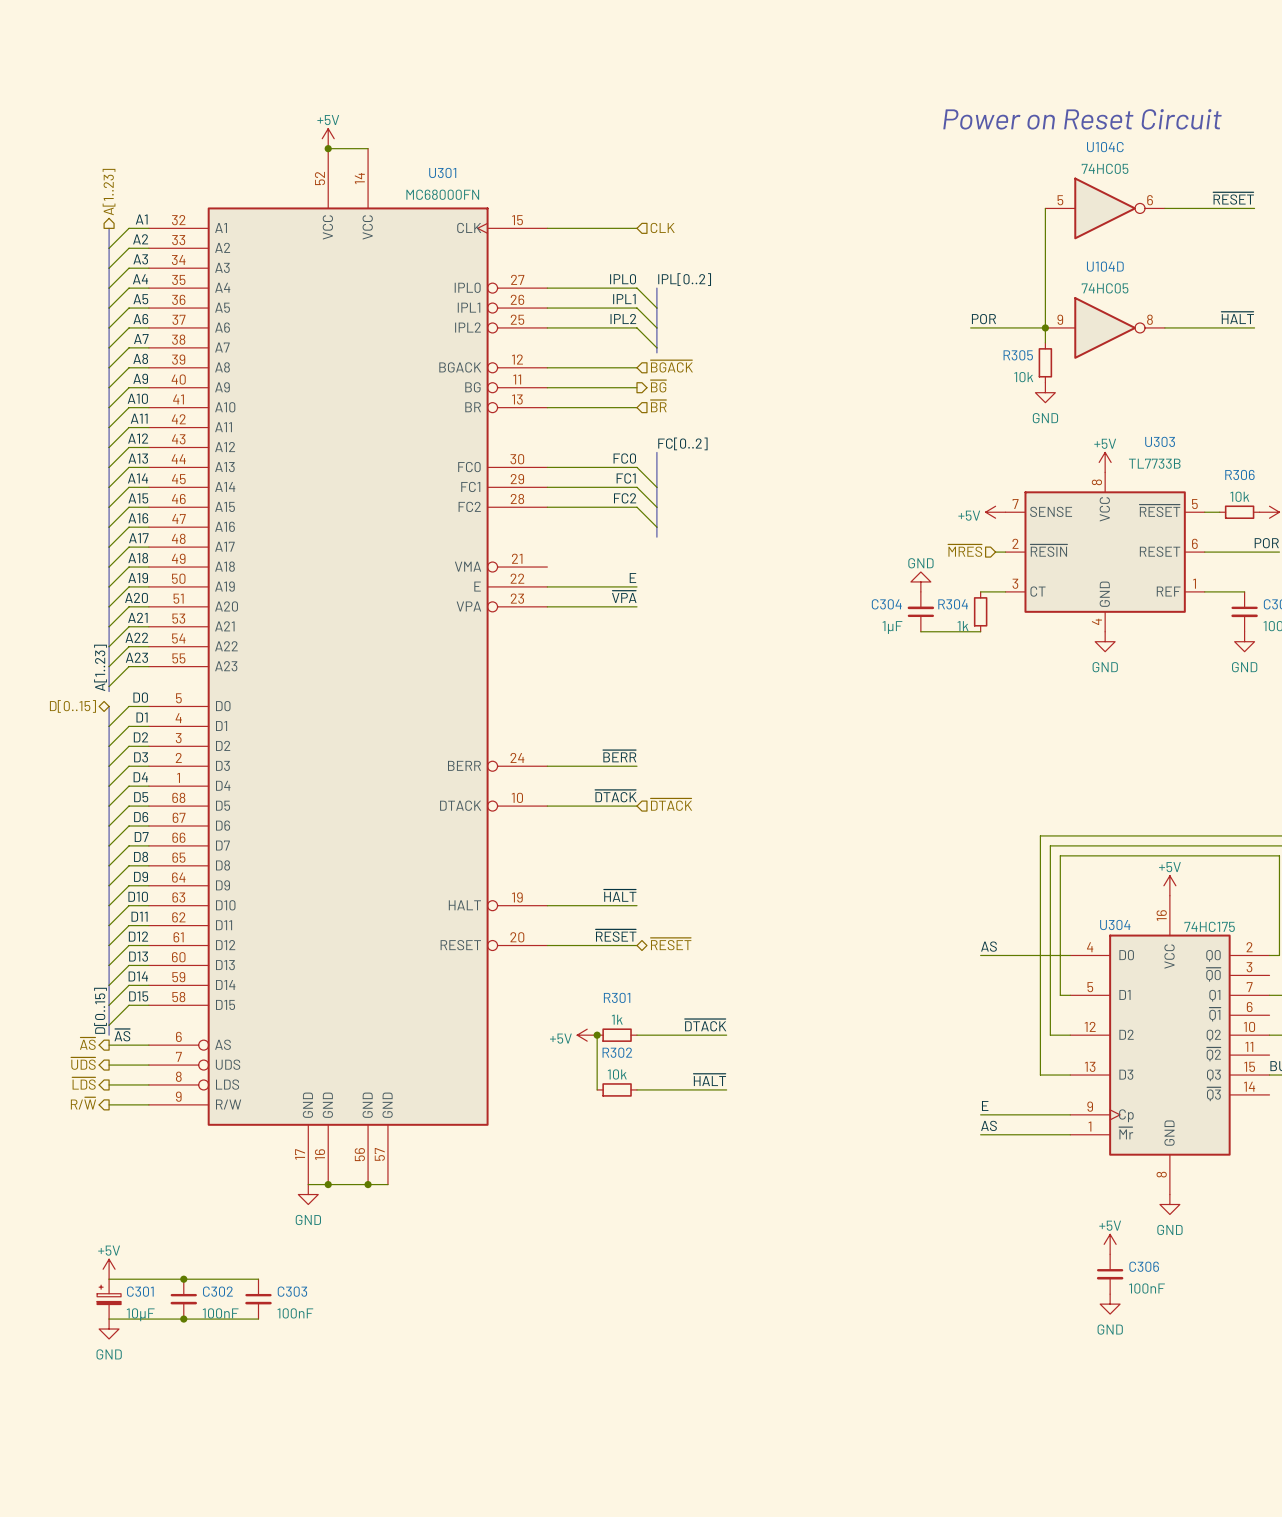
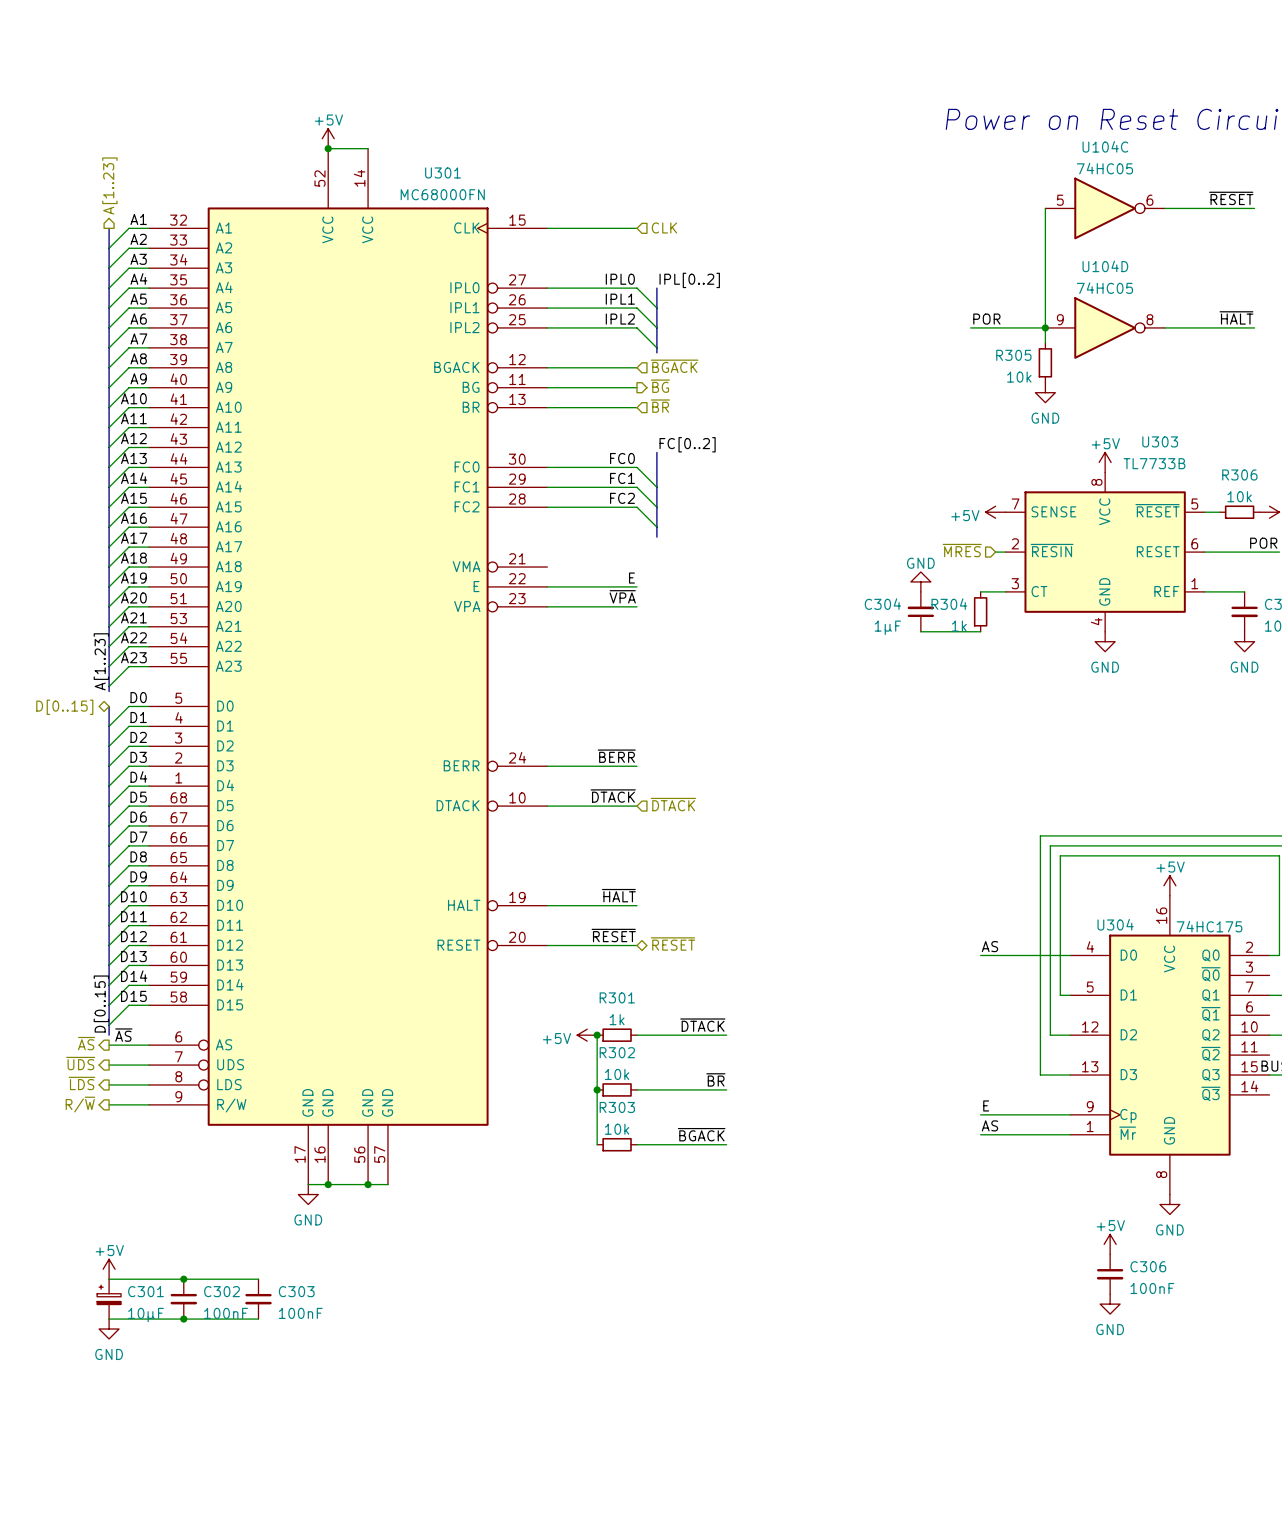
label: ~{HALT} (709, 1079) -> ~{BR} (715, 1079)
wire: none -> (597, 1089) (597, 1144)
junction: none -> (597, 1089)
label: none -> ~{BGACK} (701, 1134)
R303: none -> 10k (617, 1144)
wire: none -> (636, 1144) (726, 1144)

